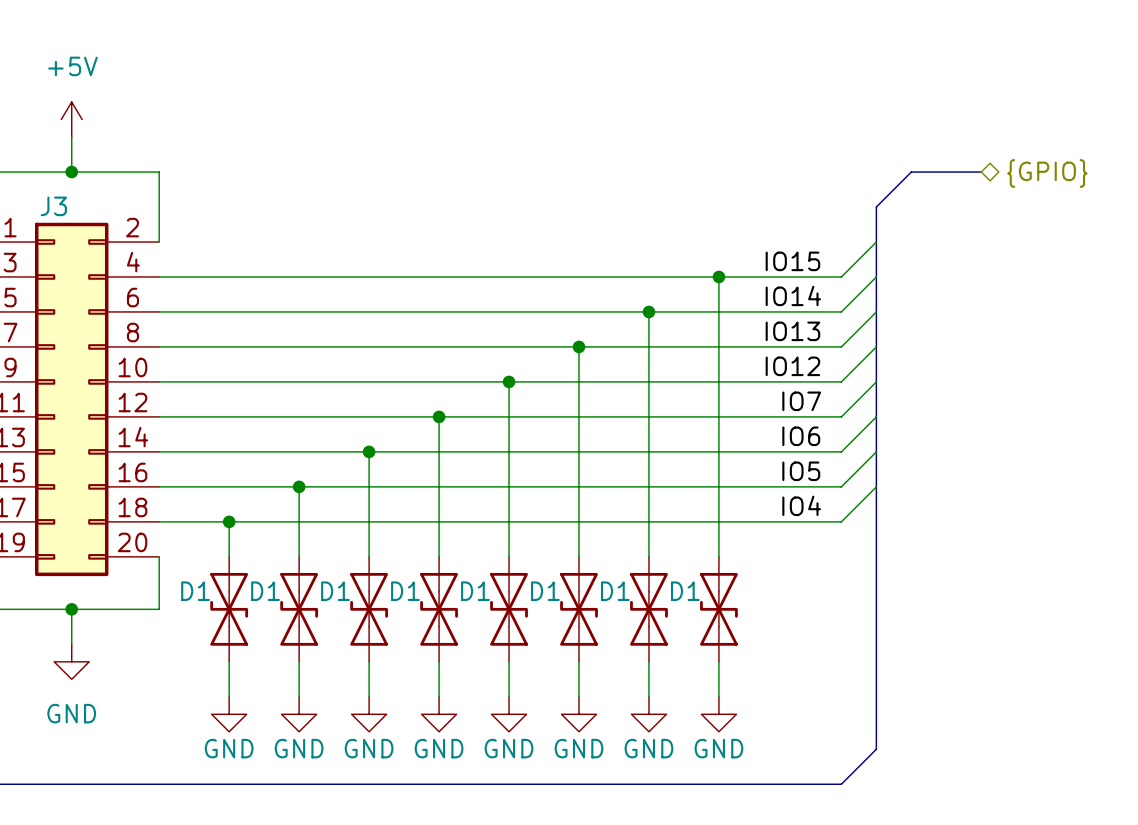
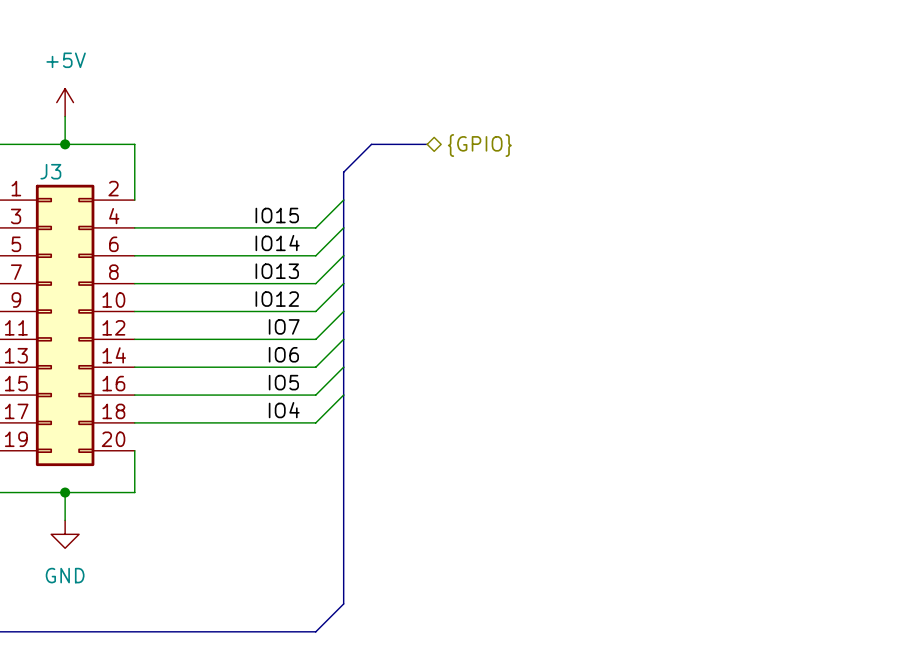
bus: (981, 172) (911, 172) (876, 207) (876, 749) (841, 784) (386, 784) -> (427, 144) (371, 144) (343, 172) (343, 603) (315, 631)
hierarchical label: none -> {GPIO} (479, 145)
hierarchical label: {GPIO} (1047, 173) -> none
wire: (876, 242) (841, 276) (386, 276) -> (343, 200) (315, 227)
label: none -> IO15 (277, 215)
label: IO15 (792, 261) -> none
wire: (718, 276) (718, 556) -> none
junction: (718, 276) -> none
wire: (876, 276) (841, 311) (386, 311) -> (343, 227) (315, 255)
label: none -> IO14 (277, 243)
label: IO14 (793, 295) -> none
wire: (648, 311) (648, 556) -> none
junction: (648, 311) -> none
wire: (876, 311) (841, 346) (386, 346) -> (343, 255) (315, 283)
label: none -> IO13 (277, 271)
label: IO13 (792, 331) -> none
wire: (579, 346) (579, 556) -> none
junction: (579, 346) -> none
wire: (876, 346) (841, 381) (386, 381) -> (343, 283) (315, 311)
label: none -> IO12 (277, 299)
label: IO12 (792, 366) -> none
wire: (509, 381) (509, 556) -> none
junction: (509, 381) -> none
wire: (876, 381) (841, 416) (386, 416) -> (343, 311) (315, 339)
label: none -> IO7 (284, 326)
label: IO7 (801, 401) -> none
wire: (439, 416) (439, 556) -> none
junction: (439, 416) -> none
wire: (876, 416) (841, 451) (386, 451) -> (343, 339) (315, 367)
label: none -> IO6 (283, 354)
label: IO6 (801, 436) -> none
wire: (369, 451) (369, 556) -> none
junction: (369, 451) -> none
wire: (876, 451) (841, 486) (386, 486) -> (343, 367) (315, 395)
label: none -> IO5 (283, 382)
label: IO5 (801, 471) -> none
wire: (299, 486) (299, 556) -> none
junction: (299, 486) -> none
wire: (876, 486) (841, 521) (386, 521) -> (343, 395) (315, 422)
label: none -> IO4 (284, 410)
label: IO4 (801, 505) -> none
wire: (229, 521) (229, 556) -> none
junction: (229, 521) -> none
D1: (229, 609) -> none
D1: (299, 609) -> none
D1: (369, 609) -> none
D1: (439, 609) -> none
D1: (509, 609) -> none
D1: (579, 609) -> none
D1: (648, 609) -> none
D1: (718, 609) -> none
wire: (229, 661) (229, 696) -> none
wire: (299, 661) (299, 696) -> none
wire: (369, 661) (369, 696) -> none
wire: (439, 661) (439, 696) -> none
wire: (509, 661) (509, 696) -> none
wire: (579, 661) (579, 696) -> none
wire: (648, 661) (648, 696) -> none
wire: (718, 661) (718, 696) -> none
power symbol: GND (229, 714) -> none
power symbol: GND (299, 714) -> none
power symbol: GND (369, 714) -> none
power symbol: GND (439, 714) -> none
power symbol: GND (509, 714) -> none
power symbol: GND (579, 714) -> none
power symbol: GND (648, 714) -> none
power symbol: GND (718, 714) -> none

